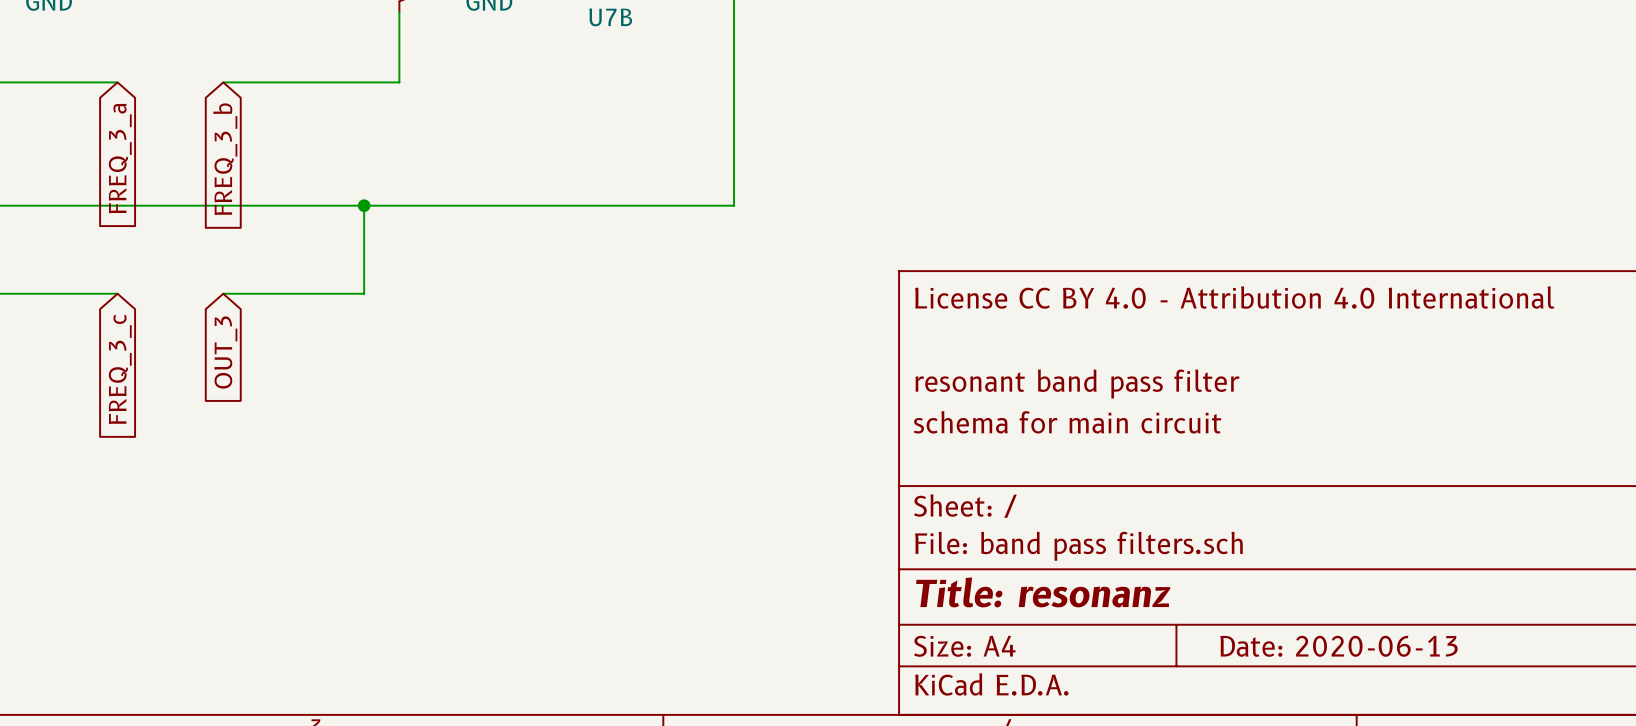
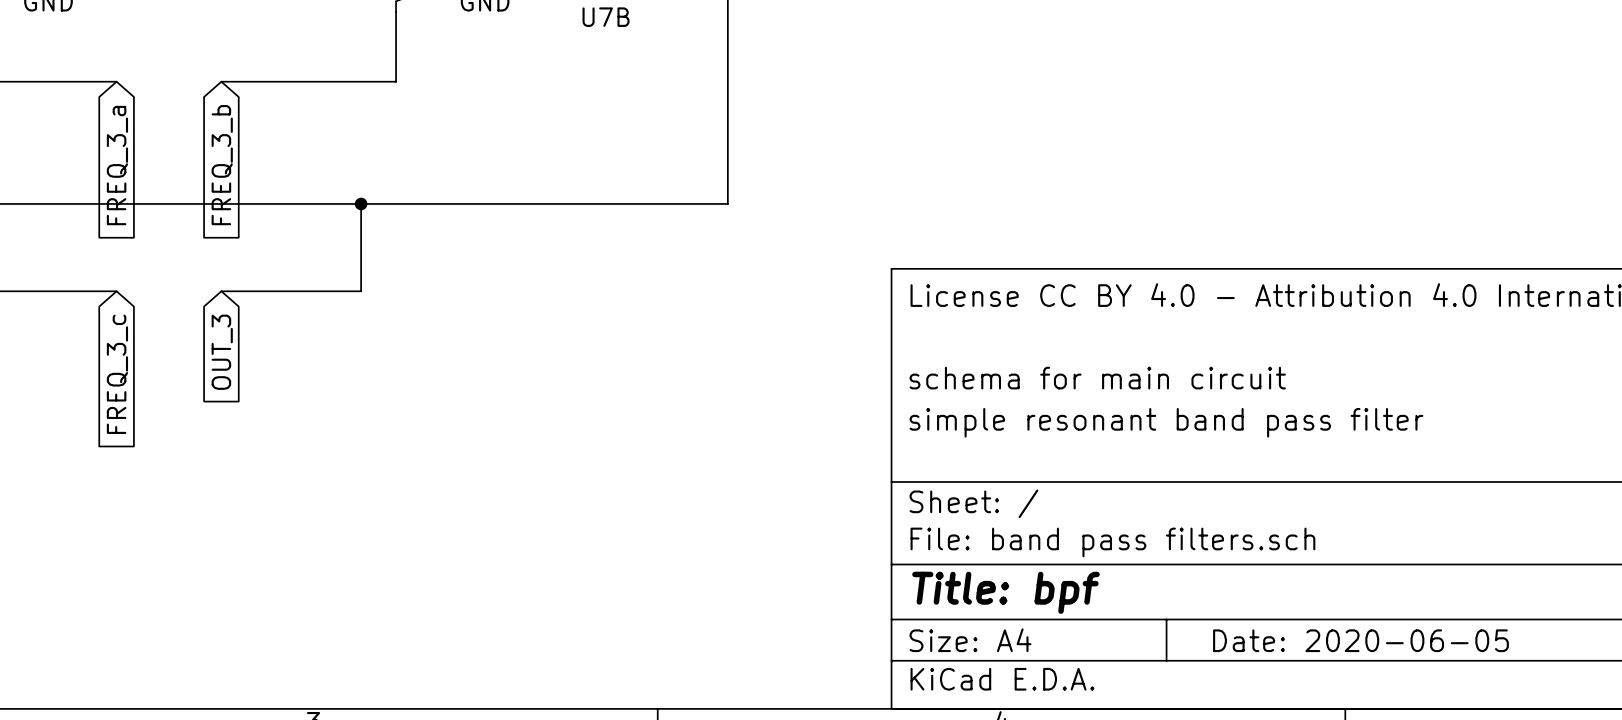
title block: resonant band pass filter (1077, 384) -> schema for main circuit (1097, 378)
title block: schema for main circuit (1067, 422) -> simple resonant band pass filter (1166, 422)
title block: Title: resonanz (1043, 592) -> Title: bpf (1005, 592)
title block: Date: 2020-06-13 (1339, 646) -> Date: 2020-06-05 (1360, 640)

